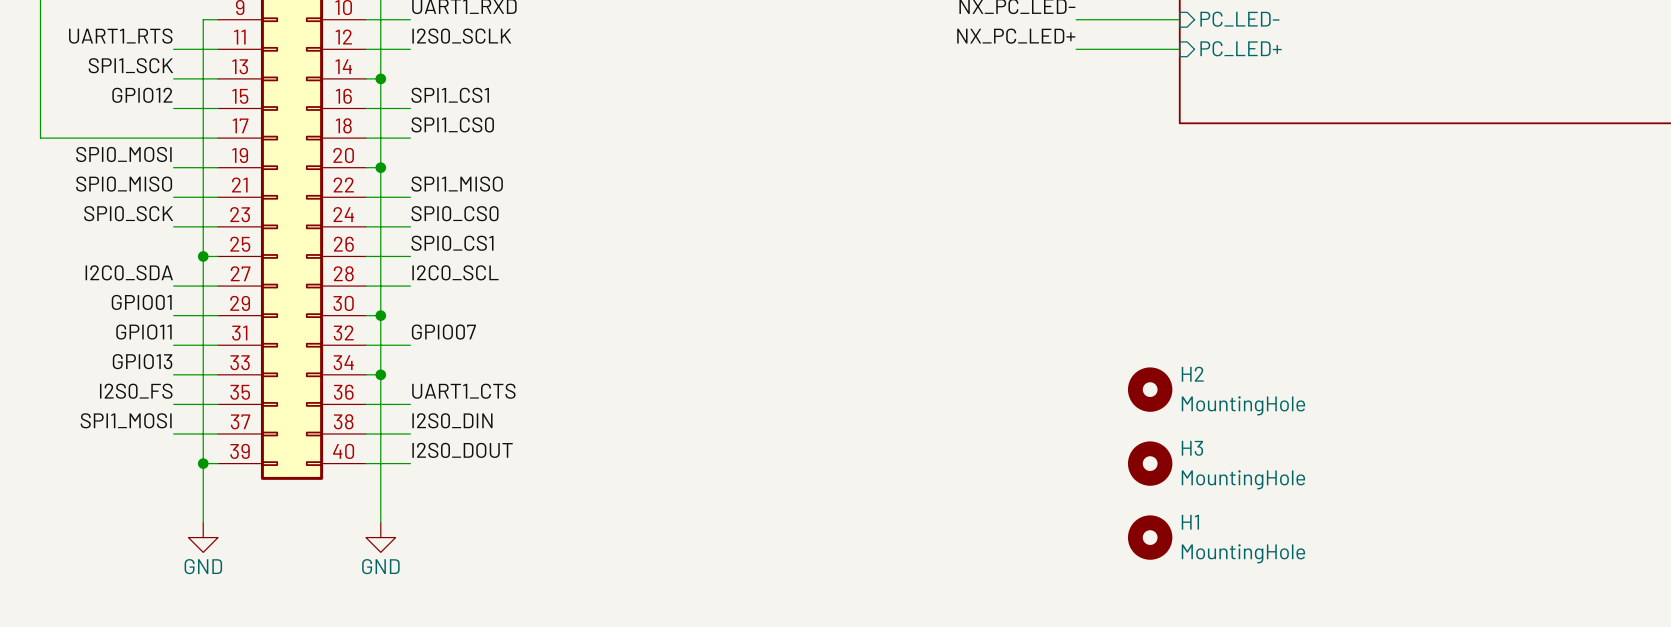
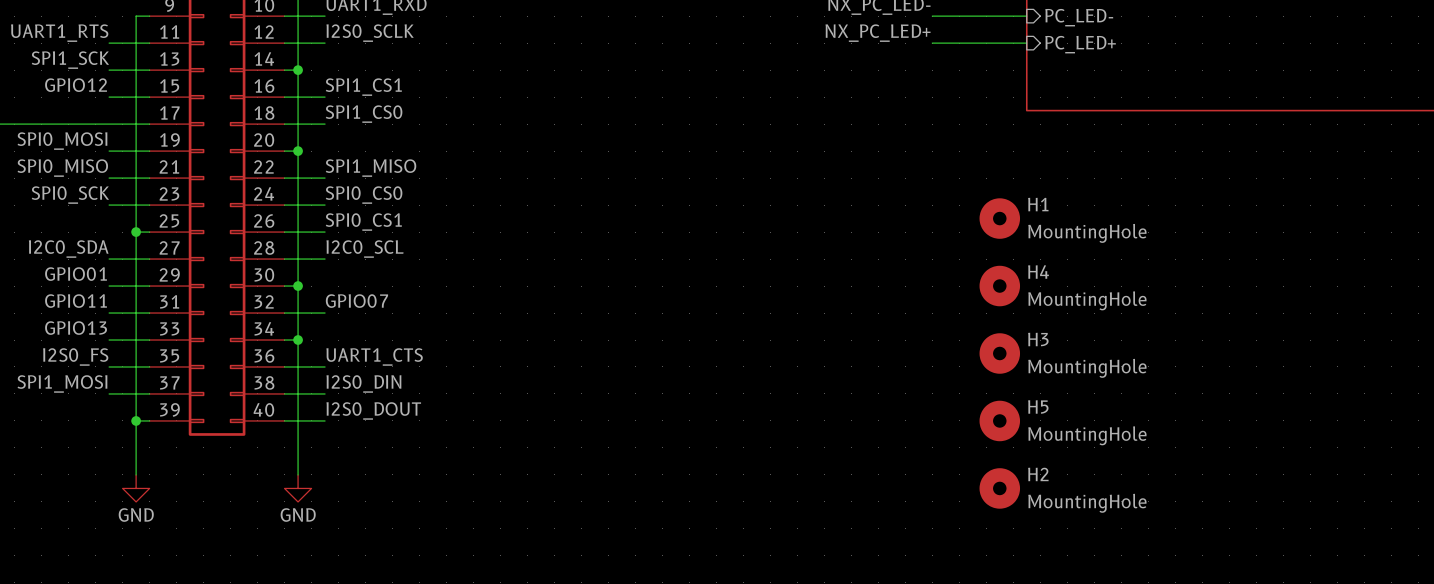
H1: none -> MountingHole (999, 218)
H4: none -> MountingHole (999, 286)
H2 name: H2 (1192, 374) -> H3 (1038, 339)
H3 name: H3 (1192, 448) -> H5 (1038, 406)
H1 name: H1 (1190, 522) -> H2 (1038, 474)

